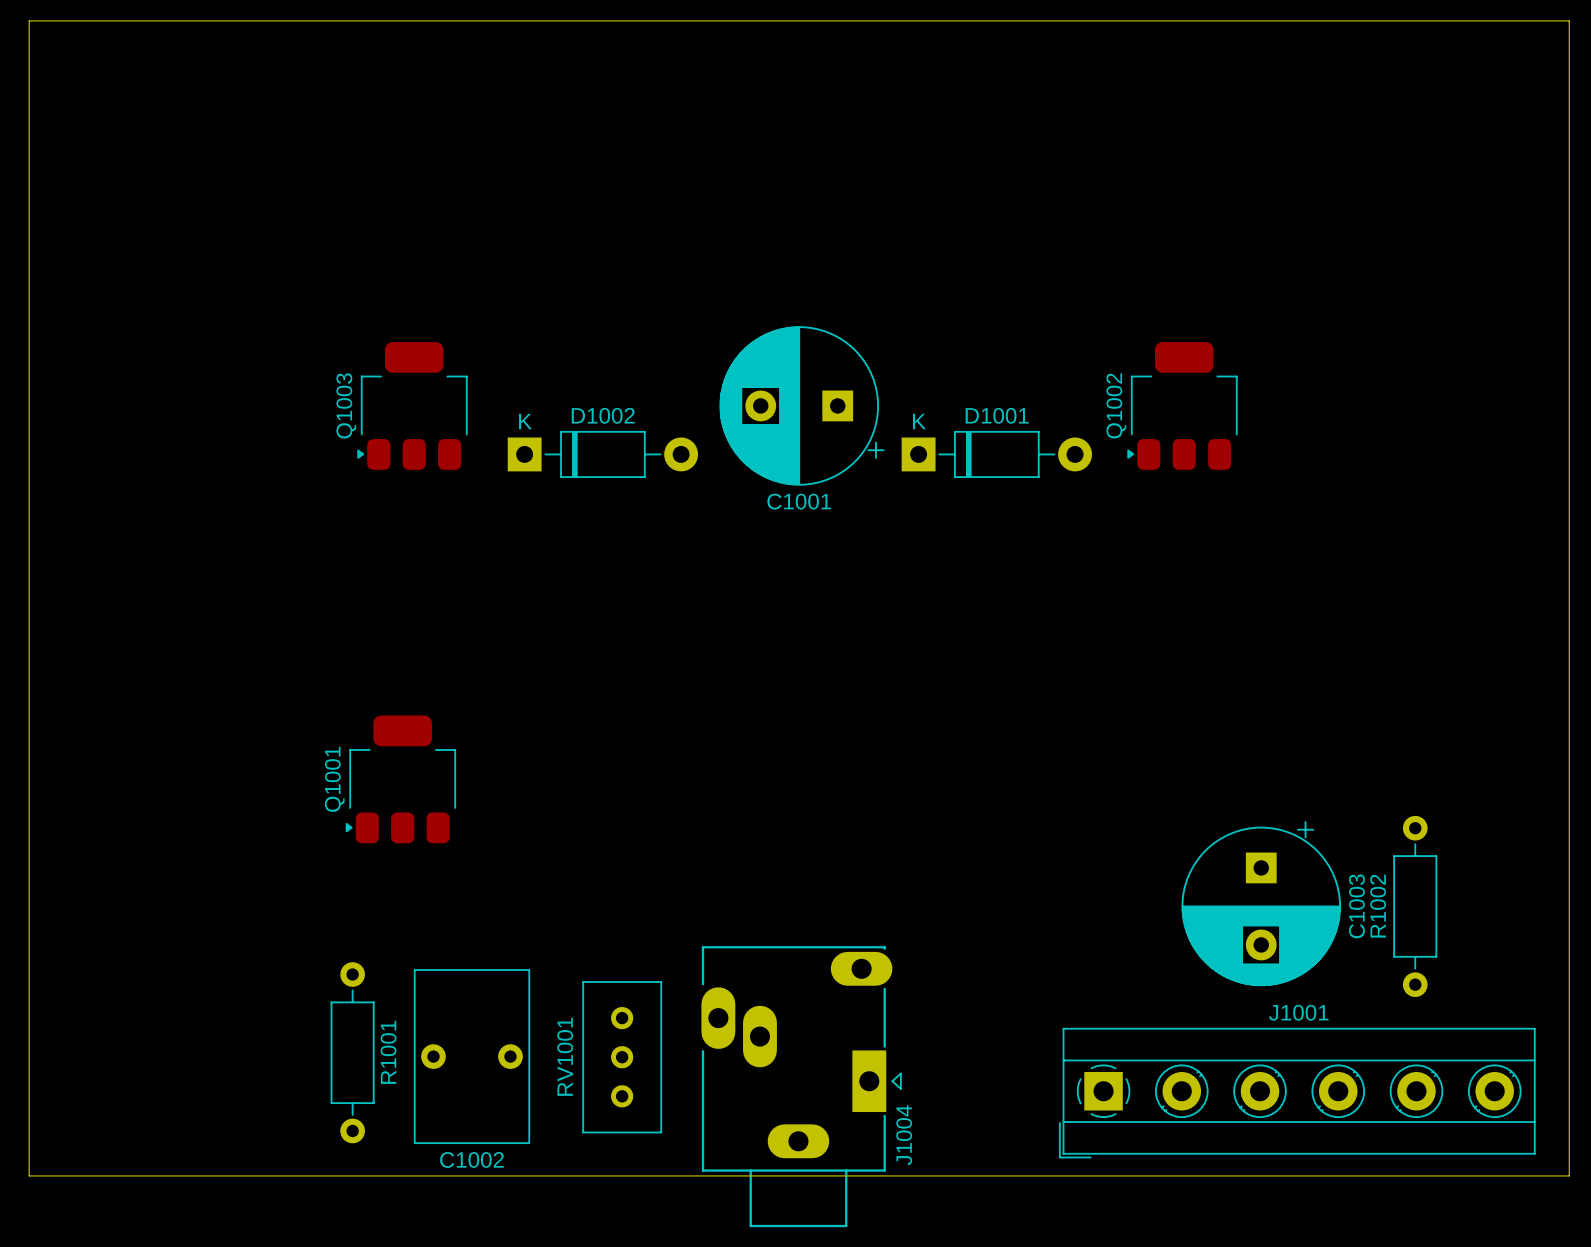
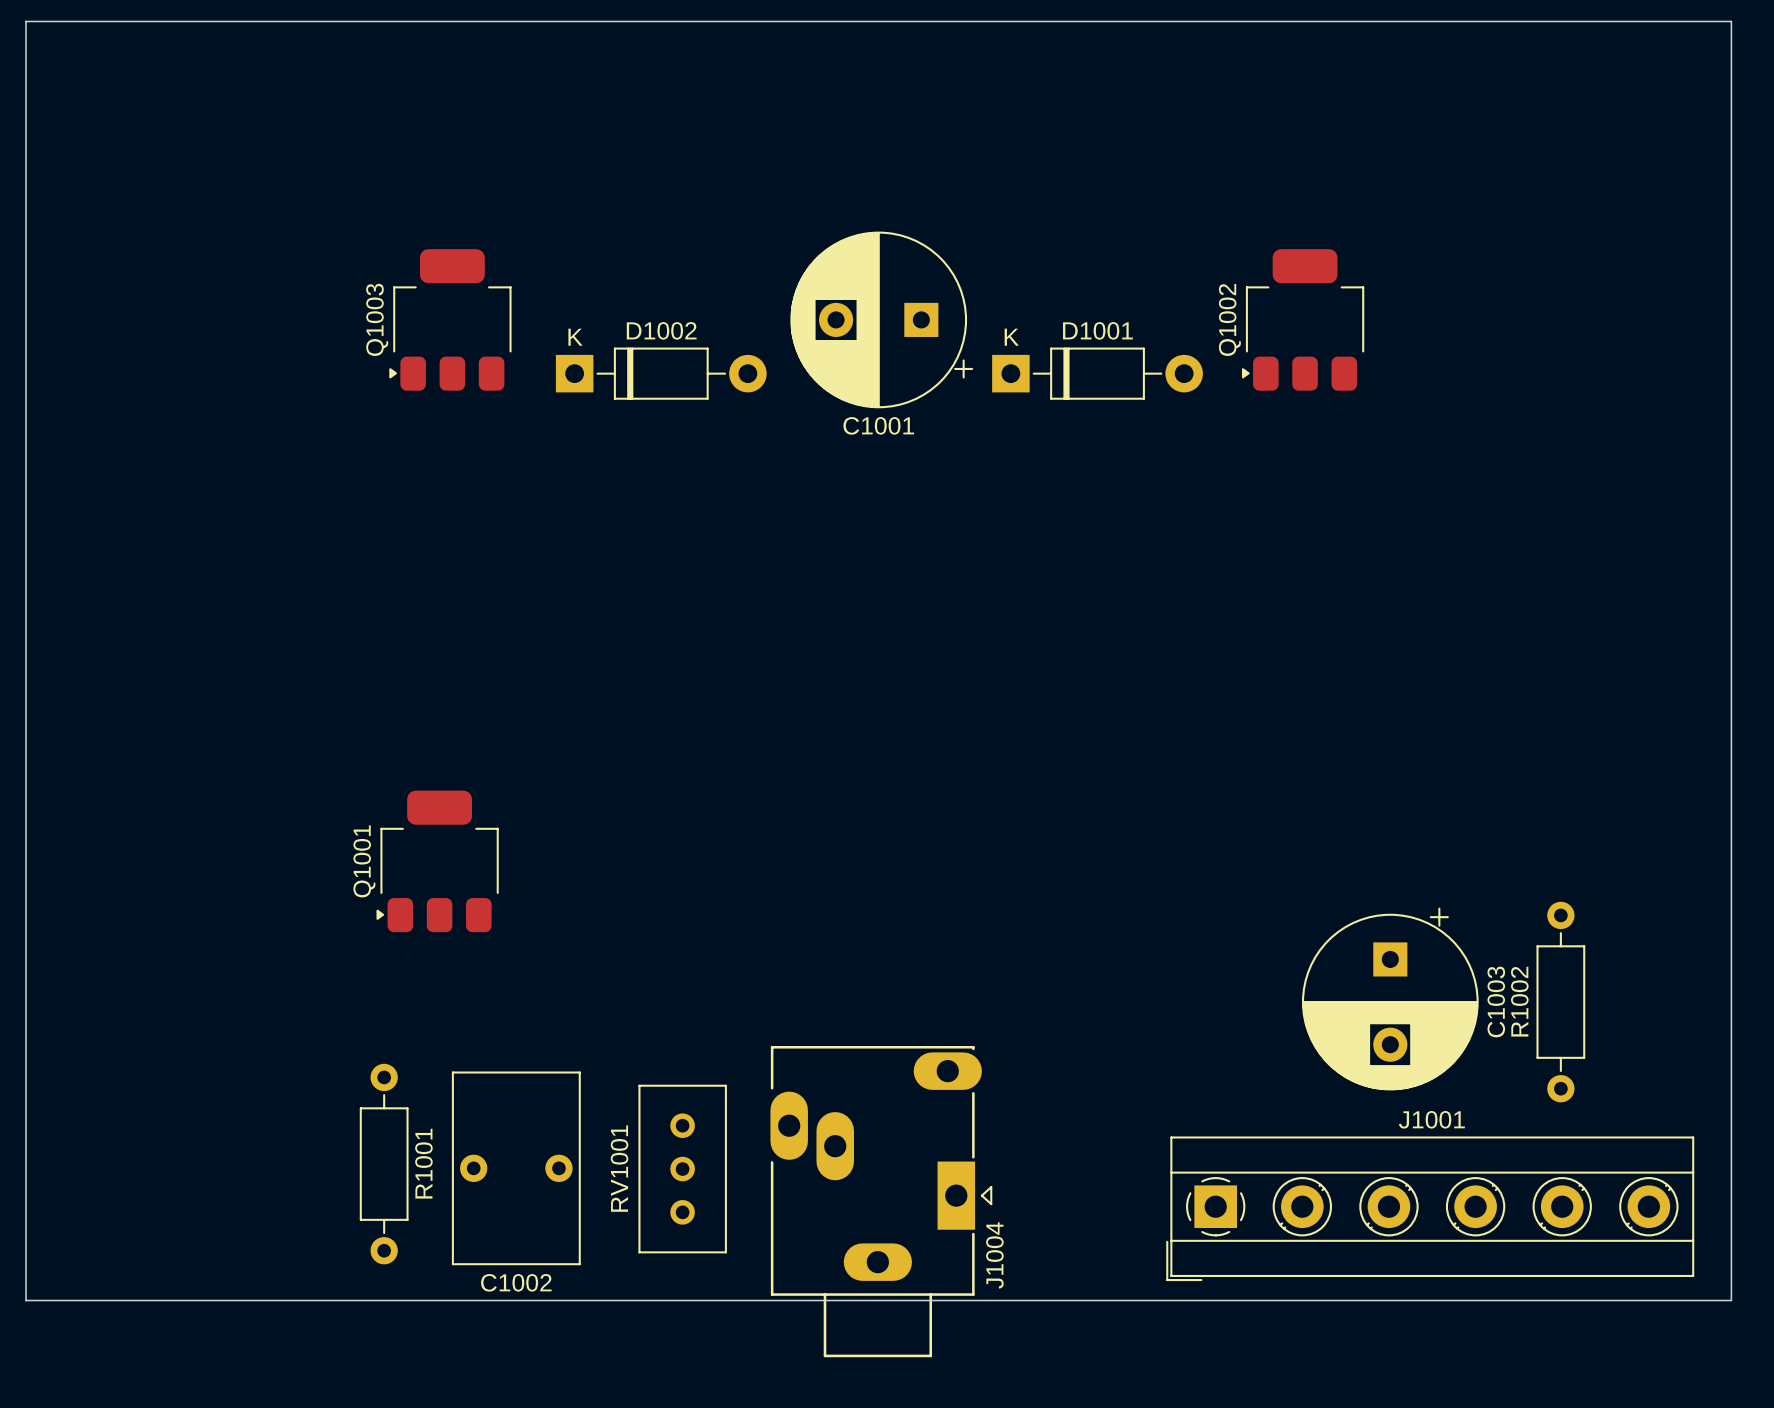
Q1003 position: (412, 405) -> (450, 319)
C1001 position: (802, 405) -> (881, 319)
Q1002 position: (1182, 405) -> (1303, 319)
D1002 position: (602, 454) -> (661, 373)
D1001 position: (996, 454) -> (1097, 373)

